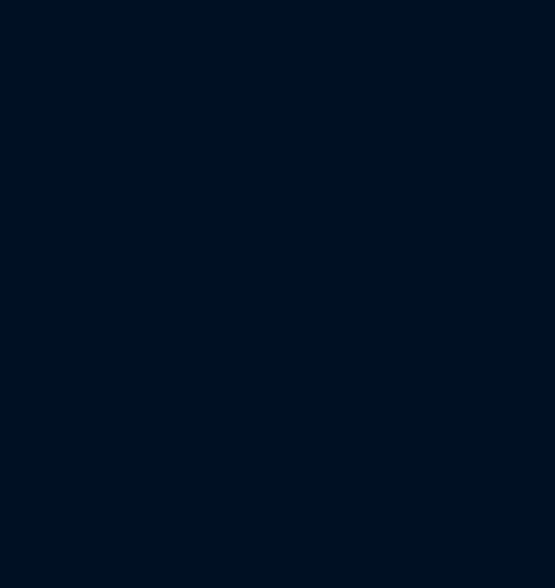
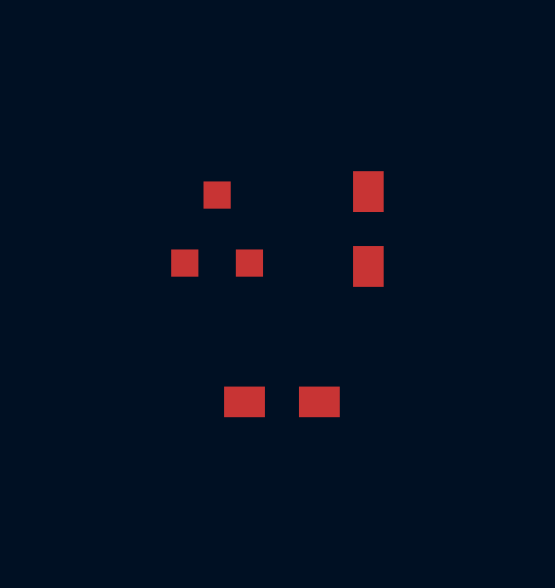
part: none -> (217, 229)
part: none -> (368, 229)
part: none -> (281, 401)

